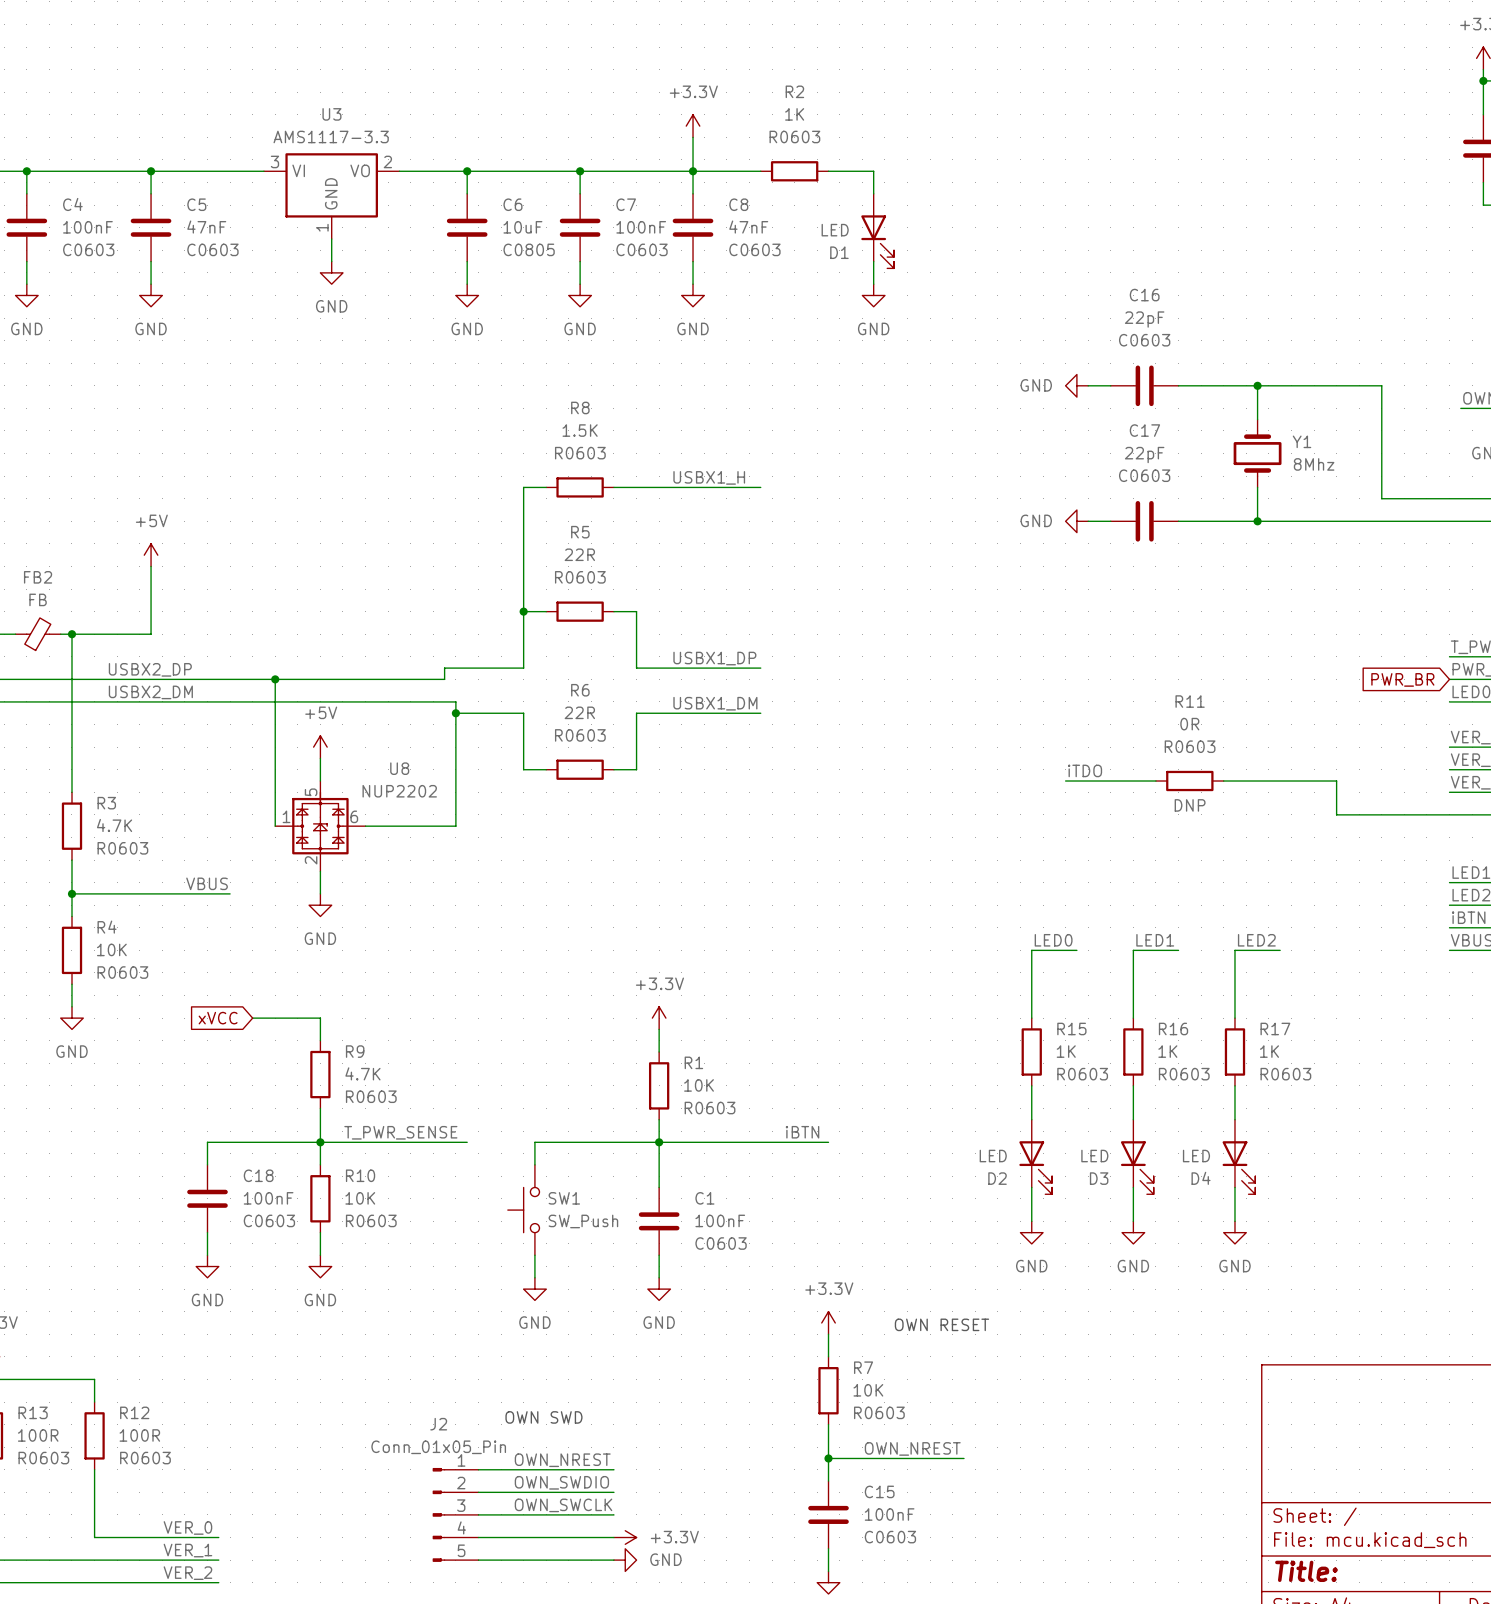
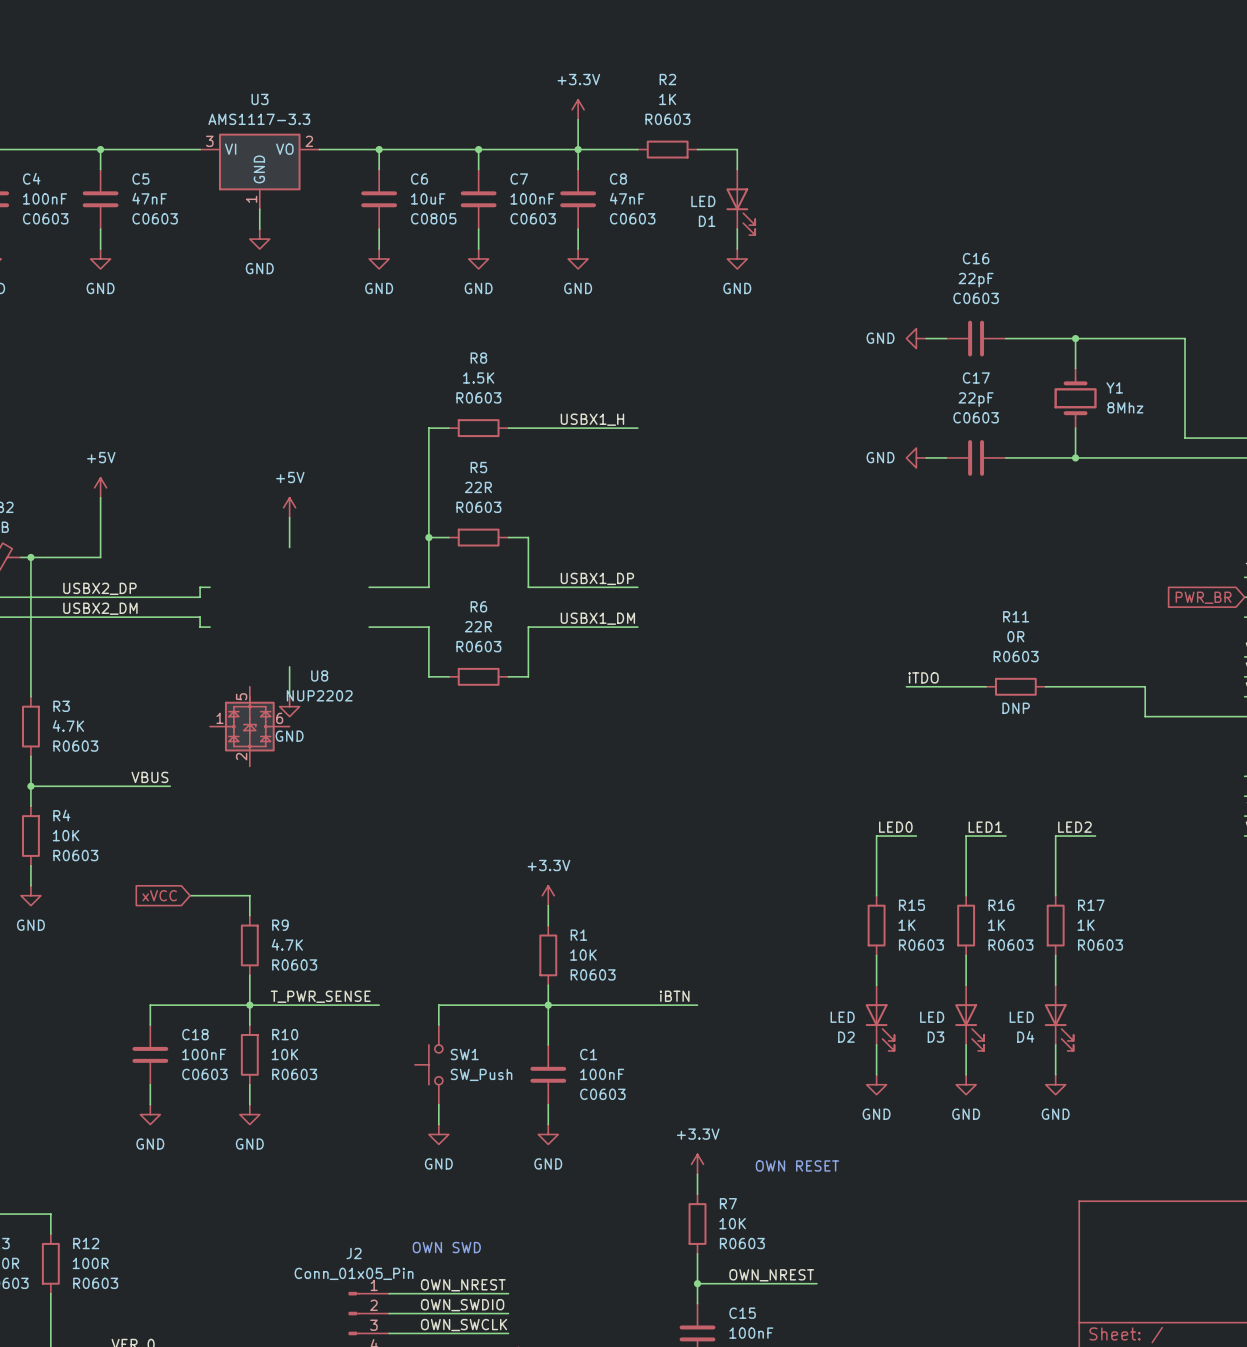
wire: none -> (289, 517) (289, 547)
wire: (455, 668) (444, 668) (444, 679) (263, 679) -> (210, 587) (200, 587) (200, 597)
wire: (275, 679) (275, 826) -> none
junction: (275, 679) -> none
wire: (263, 701) (455, 701) (455, 826) (365, 826) -> (200, 617) (200, 627) (210, 627)
junction: (455, 713) -> none
power symbol position: +5V (320, 747) -> +5V (289, 507)
wire: (320, 758) (320, 781) -> none
wire: none -> (289, 666) (289, 696)
wire: (320, 871) (320, 893) -> none
power symbol position: GND (320, 905) -> GND (289, 706)

